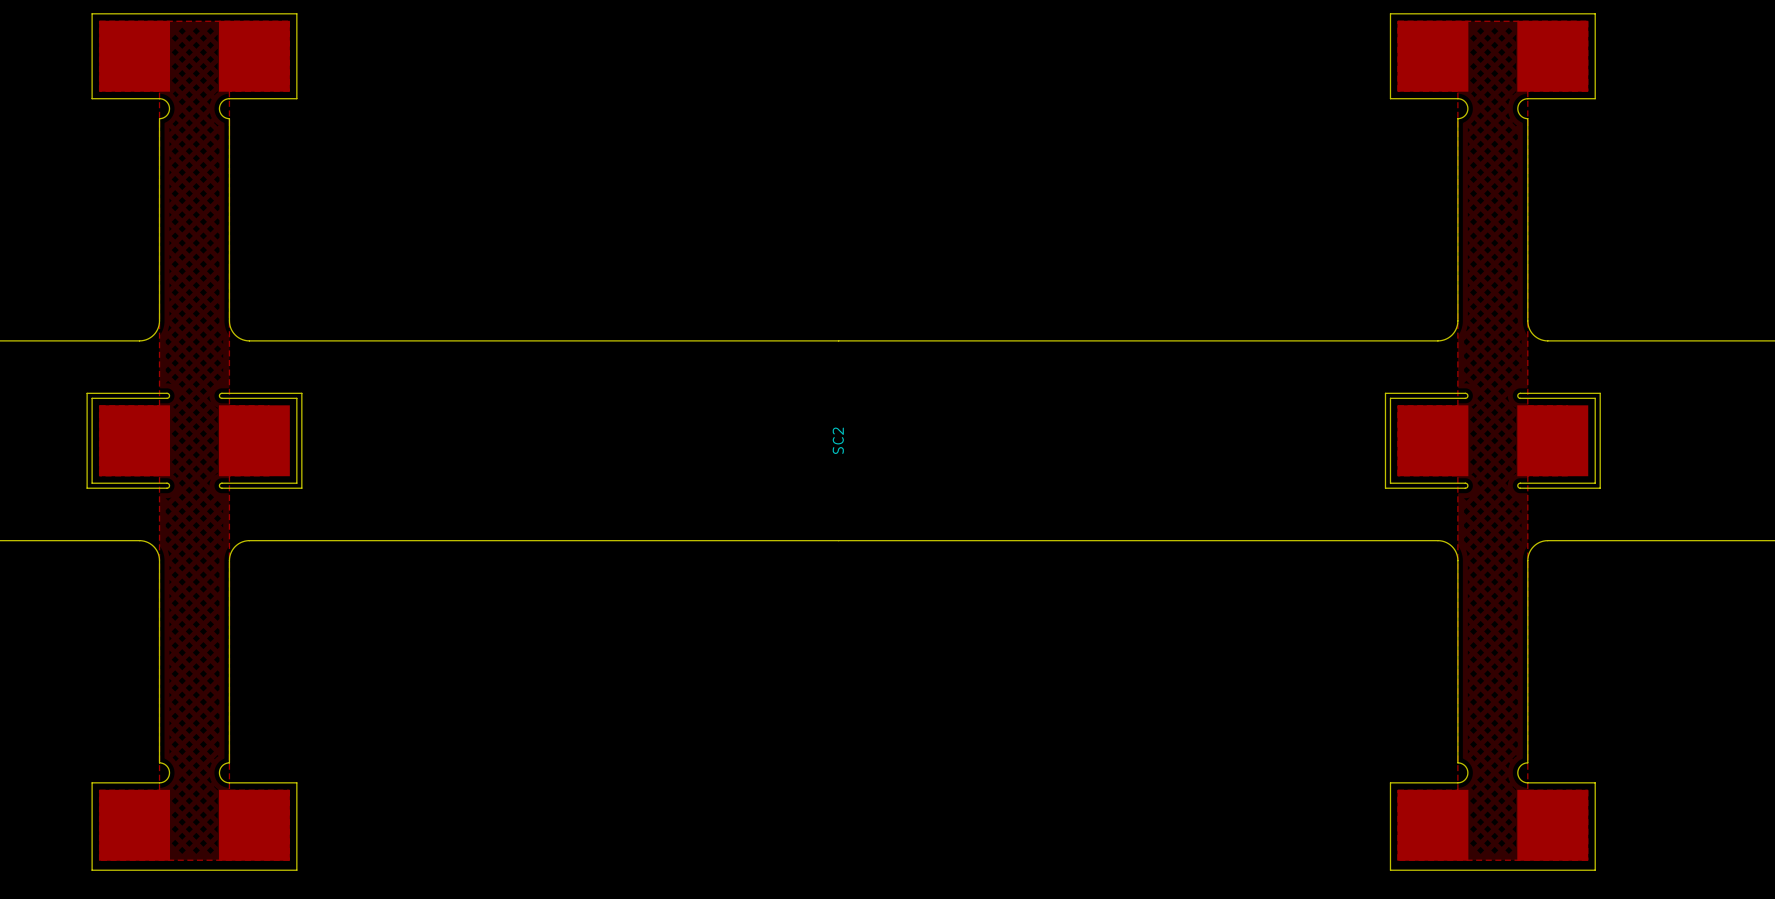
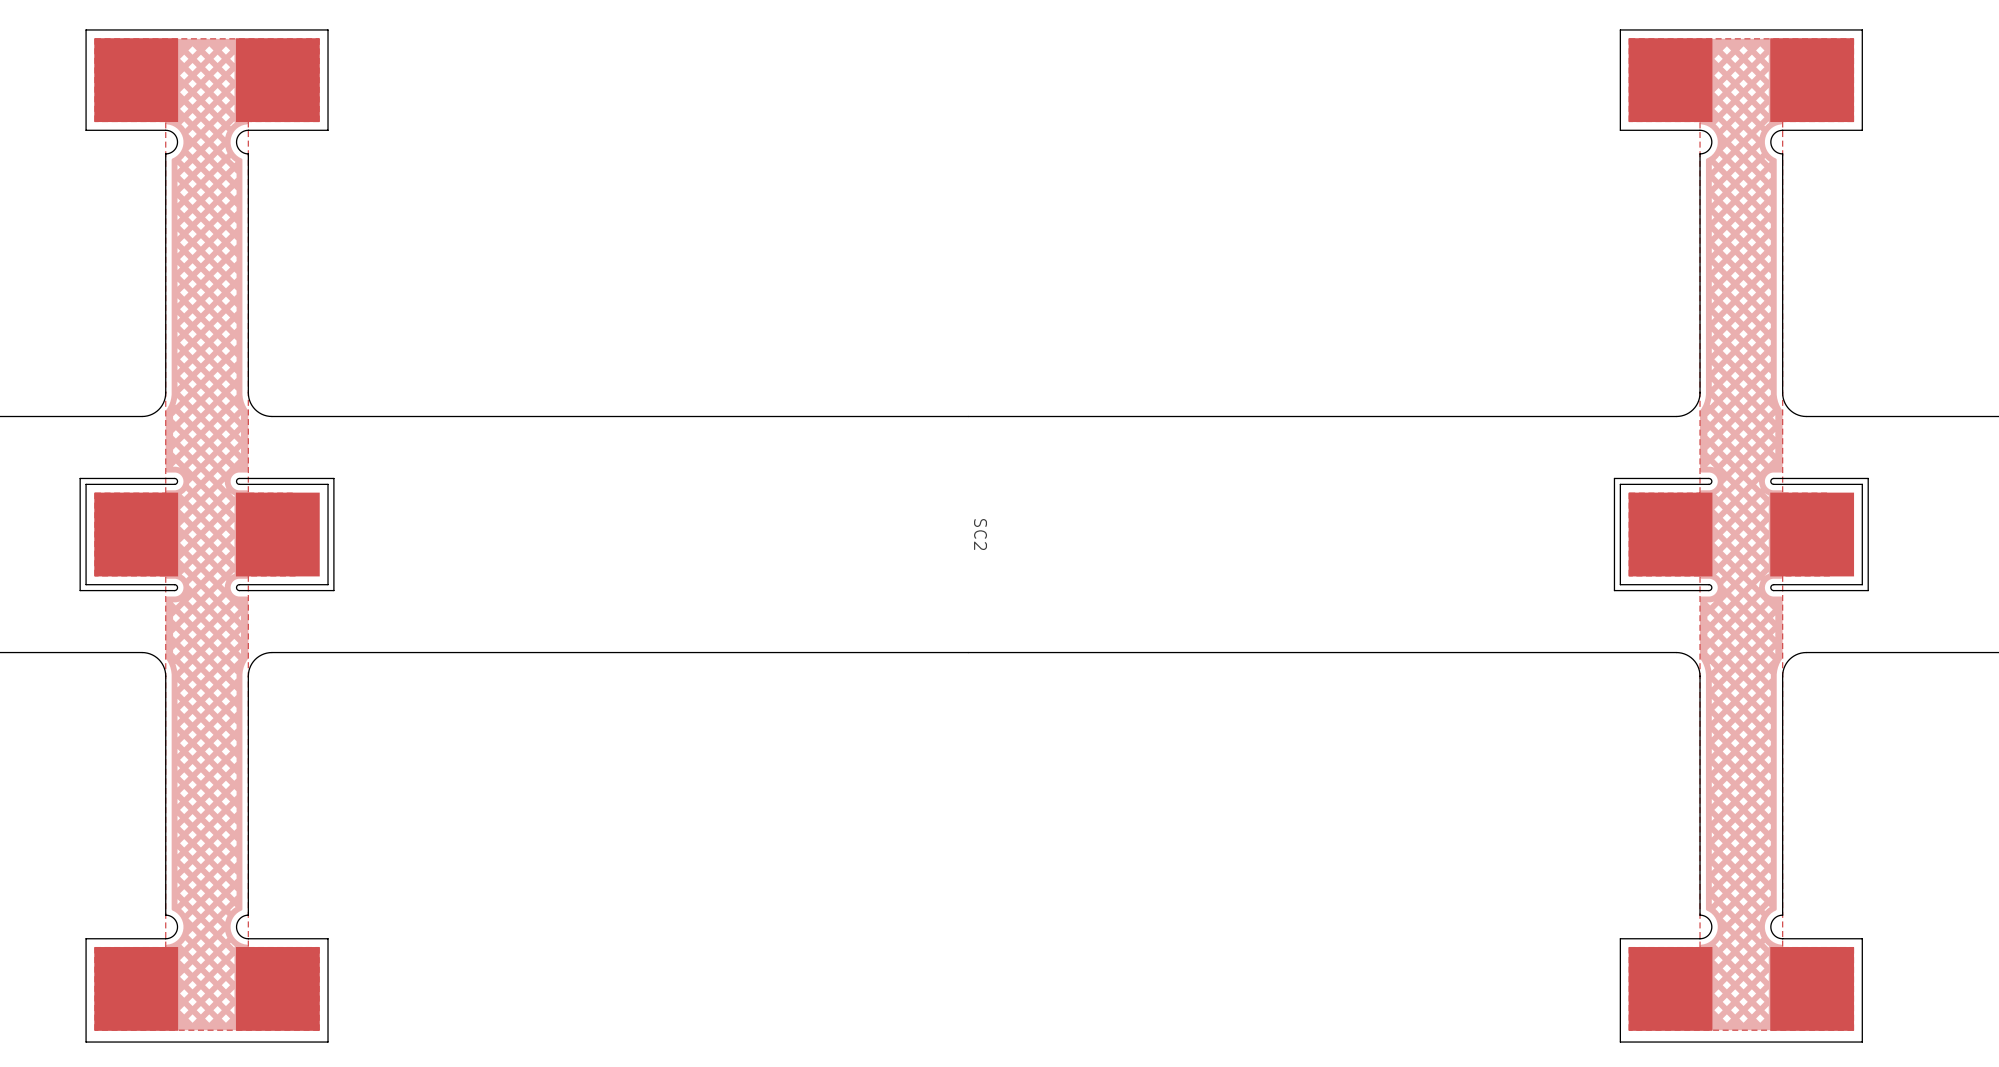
SC2 name rotation: 0° (838, 440) -> 180° (980, 534)

